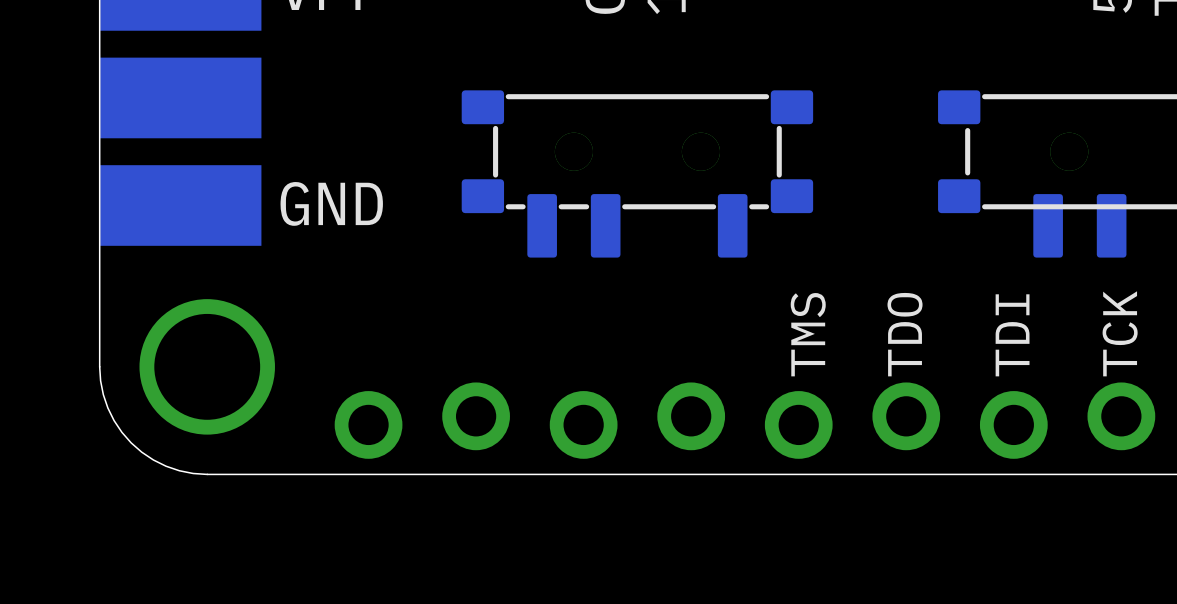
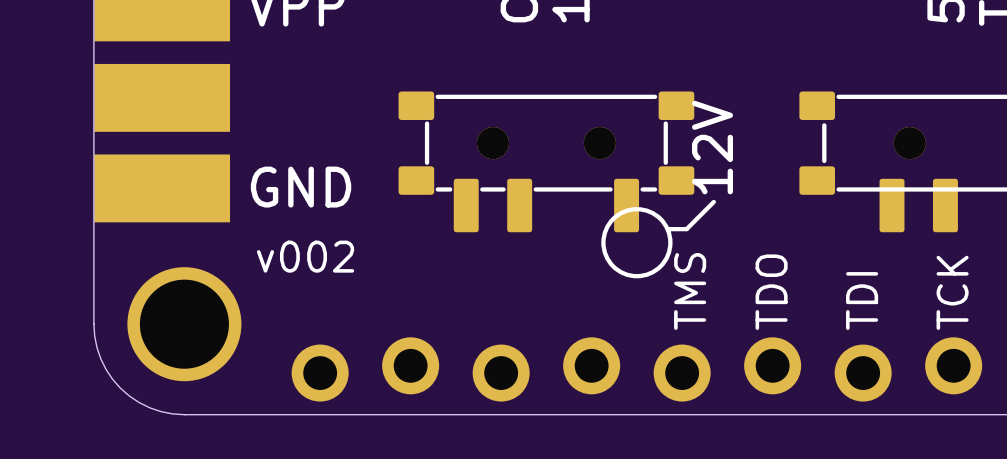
text: none -> 12V (712, 147)
line: none -> (713, 201) (686, 229) (668, 229)
drawing: none -> [601, 207, 673, 279]
text: none -> v002 (305, 256)

